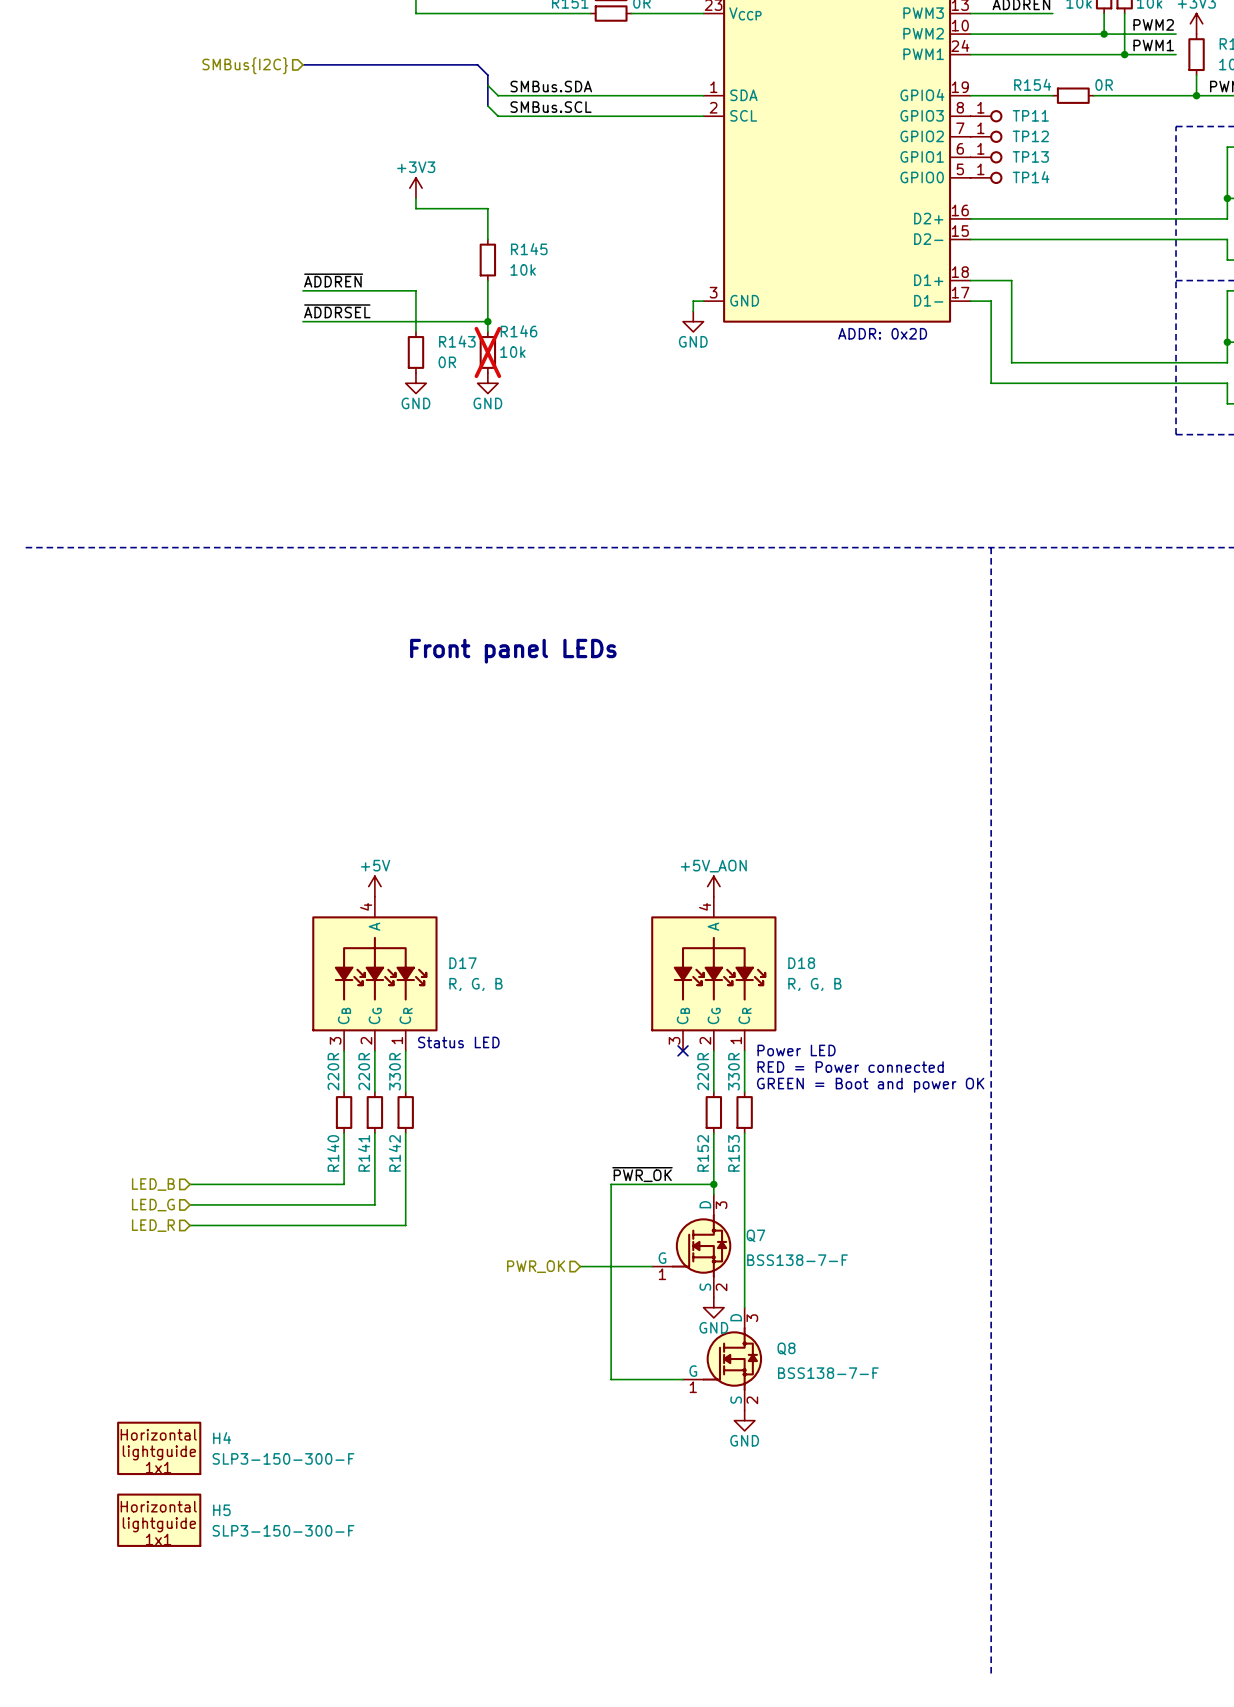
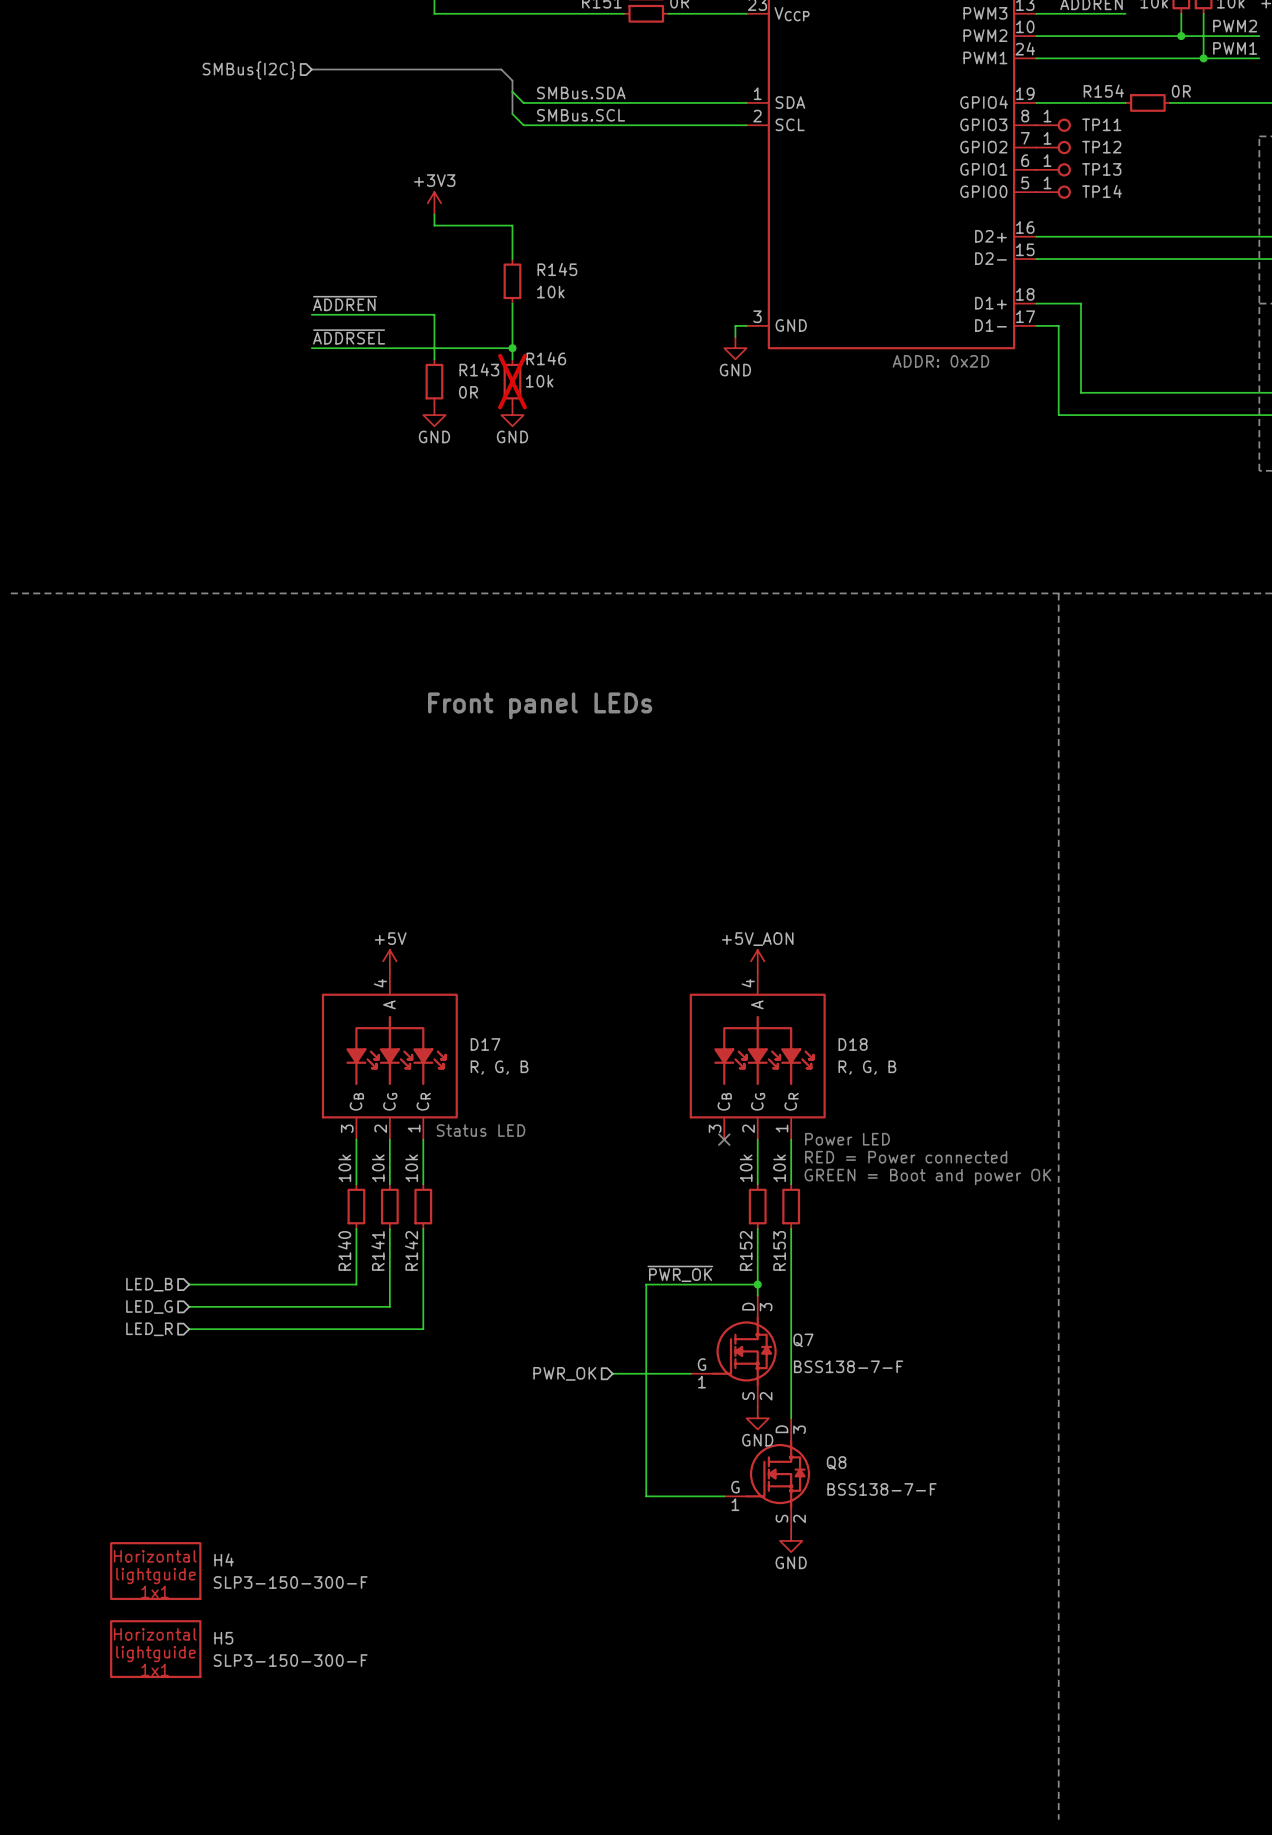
R140 text: 220R (333, 1071) -> 10k (344, 1168)
R141 text: 220R (364, 1071) -> 10k (378, 1168)
R142 text: 330R (395, 1071) -> 10k (411, 1168)
R152 text: 220R (703, 1071) -> 10k (746, 1168)
R153 text: 330R (733, 1071) -> 10k (779, 1168)

